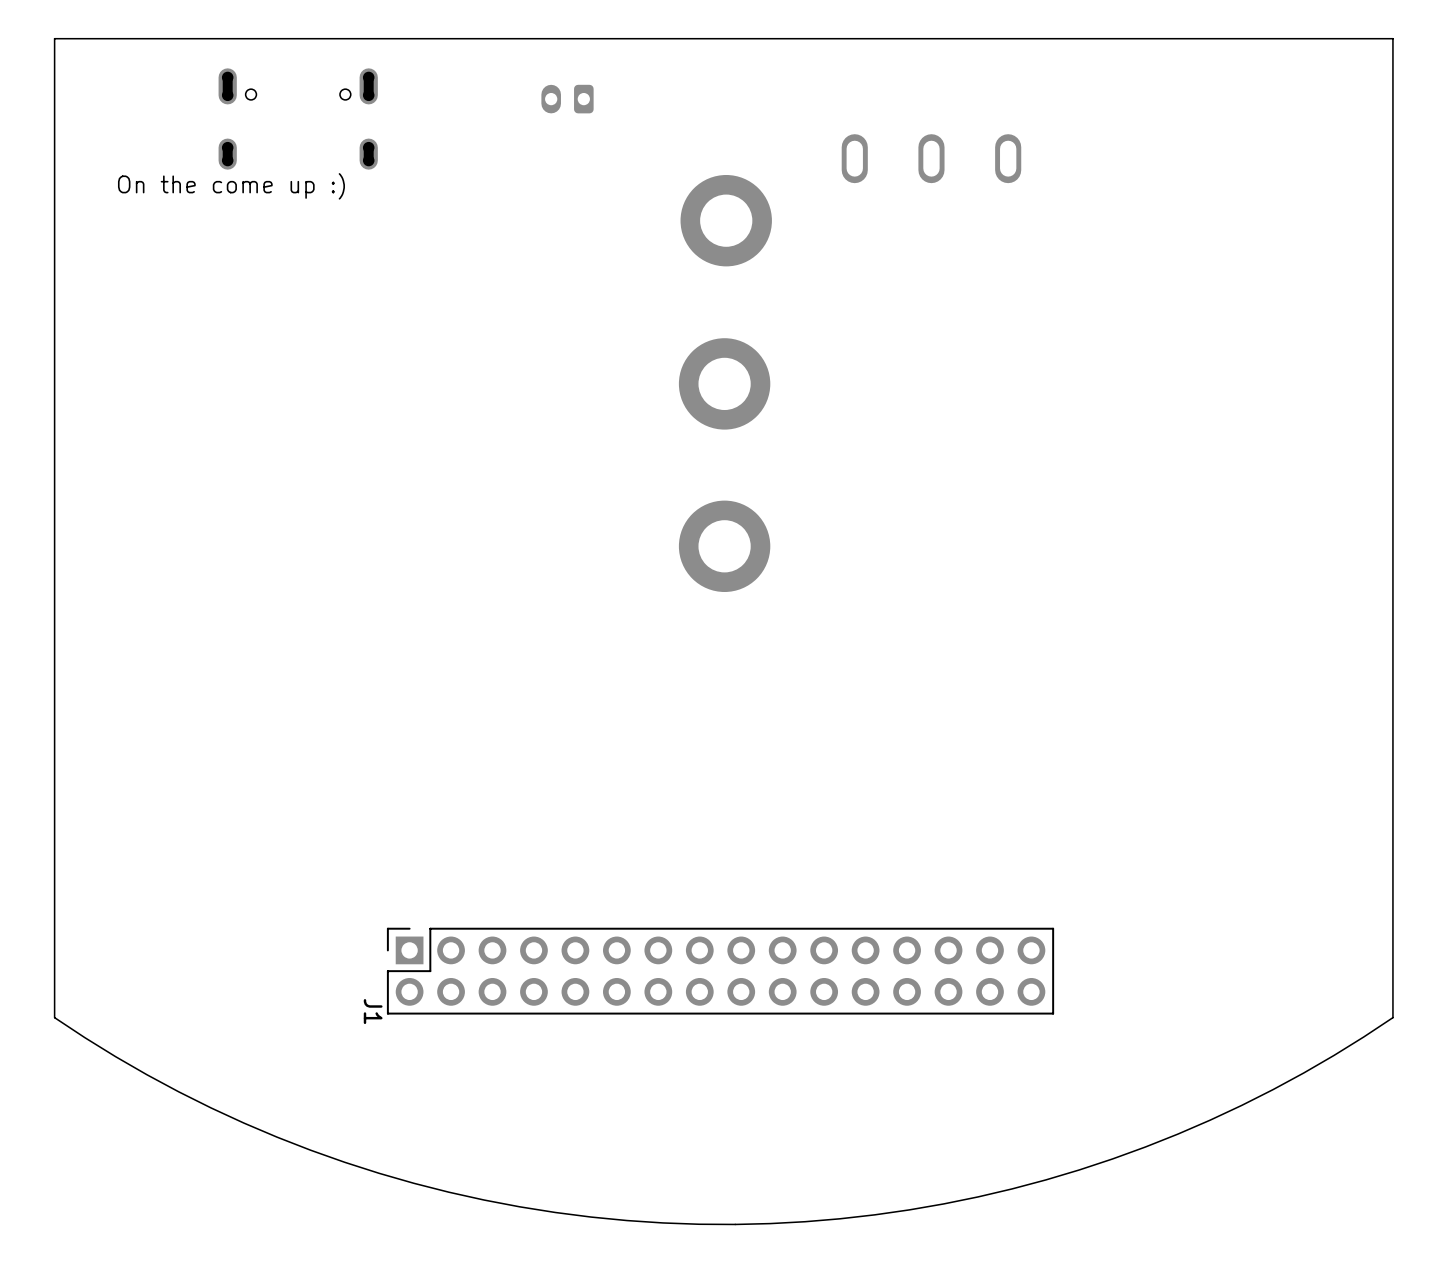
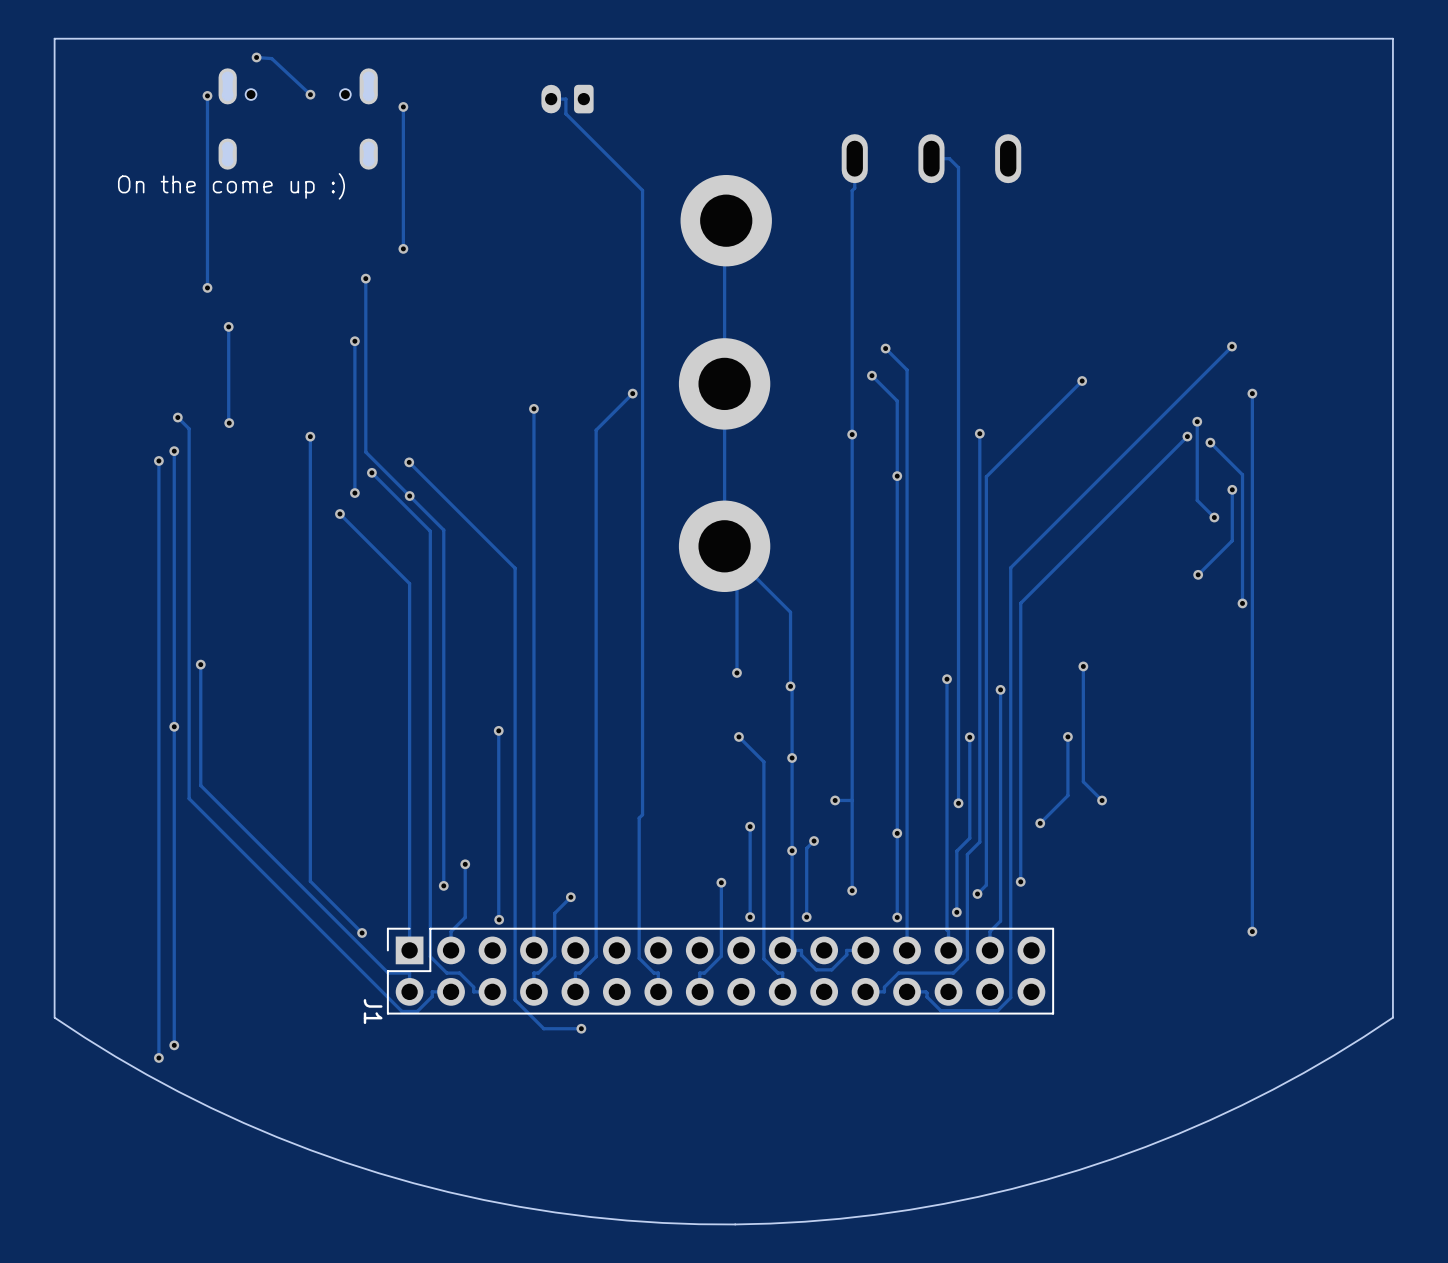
track: none -> (256, 57) (271, 58) (310, 94)
via: none -> (256, 57)
via: none -> (310, 94)
track: none -> (207, 95) (207, 287)
via: none -> (207, 95)
track: none -> (551, 99) (565, 99) (565, 113) (642, 190) (642, 814) (639, 818) (639, 958) (653, 973) (658, 973) (658, 991)
track: none -> (403, 106) (403, 248)
via: none -> (403, 106)
track: none -> (854, 158) (854, 188) (852, 190) (852, 890)
track: none -> (931, 158) (949, 158) (958, 167) (958, 803)
track: none -> (726, 220) (724, 222) (724, 546)
via: none -> (403, 248)
track: none -> (365, 278) (365, 452) (443, 530) (443, 885)
via: none -> (365, 278)
via: none -> (207, 287)
track: none -> (228, 326) (229, 423)
via: none -> (228, 326)
track: none -> (354, 341) (354, 493)
via: none -> (354, 341)
track: none -> (1231, 346) (1010, 567) (1010, 997) (997, 1010) (940, 1010) (927, 996) (925, 991) (907, 991)
via: none -> (1231, 346)
track: none -> (885, 348) (907, 369) (907, 950)
via: none -> (885, 348)
track: none -> (871, 375) (897, 400) (897, 917)
via: none -> (871, 375)
track: none -> (1082, 381) (986, 476) (986, 885) (977, 893)
via: none -> (1082, 381)
track: none -> (632, 393) (596, 430) (596, 956) (579, 973) (575, 973) (575, 991)
via: none -> (632, 393)
track: none -> (1252, 393) (1252, 931)
via: none -> (1252, 393)
track: none -> (533, 408) (533, 950)
via: none -> (533, 408)
track: none -> (177, 417) (189, 428) (189, 798) (401, 1011) (417, 1011) (432, 996) (432, 991) (451, 991)
via: none -> (177, 417)
track: none -> (1197, 421) (1197, 500) (1214, 517)
via: none -> (1197, 421)
via: none -> (229, 423)
track: none -> (979, 433) (979, 842) (967, 854) (967, 959) (953, 973) (898, 973) (884, 987) (884, 991) (865, 991)
via: none -> (979, 433)
via: none -> (852, 434)
track: none -> (310, 436) (310, 881) (362, 932)
via: none -> (310, 436)
track: none -> (1187, 436) (1020, 603) (1020, 881)
via: none -> (1187, 436)
track: none -> (1210, 442) (1242, 474) (1242, 603)
via: none -> (1210, 442)
track: none -> (174, 451) (174, 1045)
via: none -> (174, 451)
track: none -> (158, 460) (158, 1057)
via: none -> (158, 460)
track: none -> (409, 462) (515, 568) (515, 1000) (543, 1028) (581, 1028)
via: none -> (409, 462)
track: none -> (371, 472) (430, 531) (430, 956) (446, 973) (459, 973) (473, 987) (473, 991) (492, 991)
via: none -> (371, 472)
via: none -> (897, 476)
track: none -> (1232, 489) (1232, 540) (1198, 574)
via: none -> (1232, 489)
via: none -> (354, 493)
via: none -> (409, 496)
track: none -> (339, 514) (409, 583) (409, 950)
via: none -> (339, 514)
via: none -> (1214, 517)
track: none -> (724, 546) (736, 558) (736, 672)
track: none -> (724, 546) (790, 612) (792, 950)
via: none -> (1198, 574)
via: none -> (1242, 603)
track: none -> (200, 664) (200, 785) (388, 973) (409, 973) (409, 991)
via: none -> (200, 664)
track: none -> (1083, 666) (1083, 781) (1102, 800)
via: none -> (1083, 666)
via: none -> (736, 672)
track: none -> (947, 679) (948, 950)
via: none -> (947, 679)
via: none -> (790, 686)
track: none -> (1000, 689) (1000, 921) (989, 931) (989, 950)
via: none -> (1000, 689)
via: none -> (174, 726)
track: none -> (498, 730) (499, 919)
via: none -> (498, 730)
track: none -> (738, 736) (763, 761) (763, 958) (778, 973) (782, 973) (782, 991)
via: none -> (738, 736)
track: none -> (1067, 736) (1067, 795) (1040, 823)
via: none -> (1067, 736)
track: none -> (969, 737) (969, 838) (956, 851) (956, 912)
via: none -> (969, 737)
via: none -> (792, 757)
via: none -> (835, 800)
track: none -> (852, 800) (835, 800)
via: none -> (1102, 800)
via: none -> (958, 803)
via: none -> (1040, 823)
track: none -> (750, 826) (750, 917)
via: none -> (750, 826)
via: none -> (897, 833)
track: none -> (814, 841) (806, 848) (806, 917)
via: none -> (814, 841)
via: none -> (792, 850)
track: none -> (465, 864) (465, 917) (451, 931) (451, 950)
via: none -> (465, 864)
via: none -> (1020, 881)
track: none -> (721, 882) (721, 956) (704, 973) (699, 973) (699, 991)
via: none -> (721, 882)
via: none -> (443, 885)
via: none -> (852, 890)
via: none -> (977, 893)
track: none -> (570, 897) (554, 913) (554, 956) (538, 973) (533, 973) (533, 991)
via: none -> (570, 897)
via: none -> (956, 912)
via: none -> (750, 917)
via: none -> (806, 917)
via: none -> (897, 917)
via: none -> (499, 919)
via: none -> (1252, 931)
via: none -> (362, 932)
track: none -> (865, 950) (846, 950) (846, 954) (831, 969) (816, 969) (801, 955) (801, 950) (782, 950)
via: none -> (581, 1028)
via: none -> (174, 1045)
via: none -> (158, 1057)

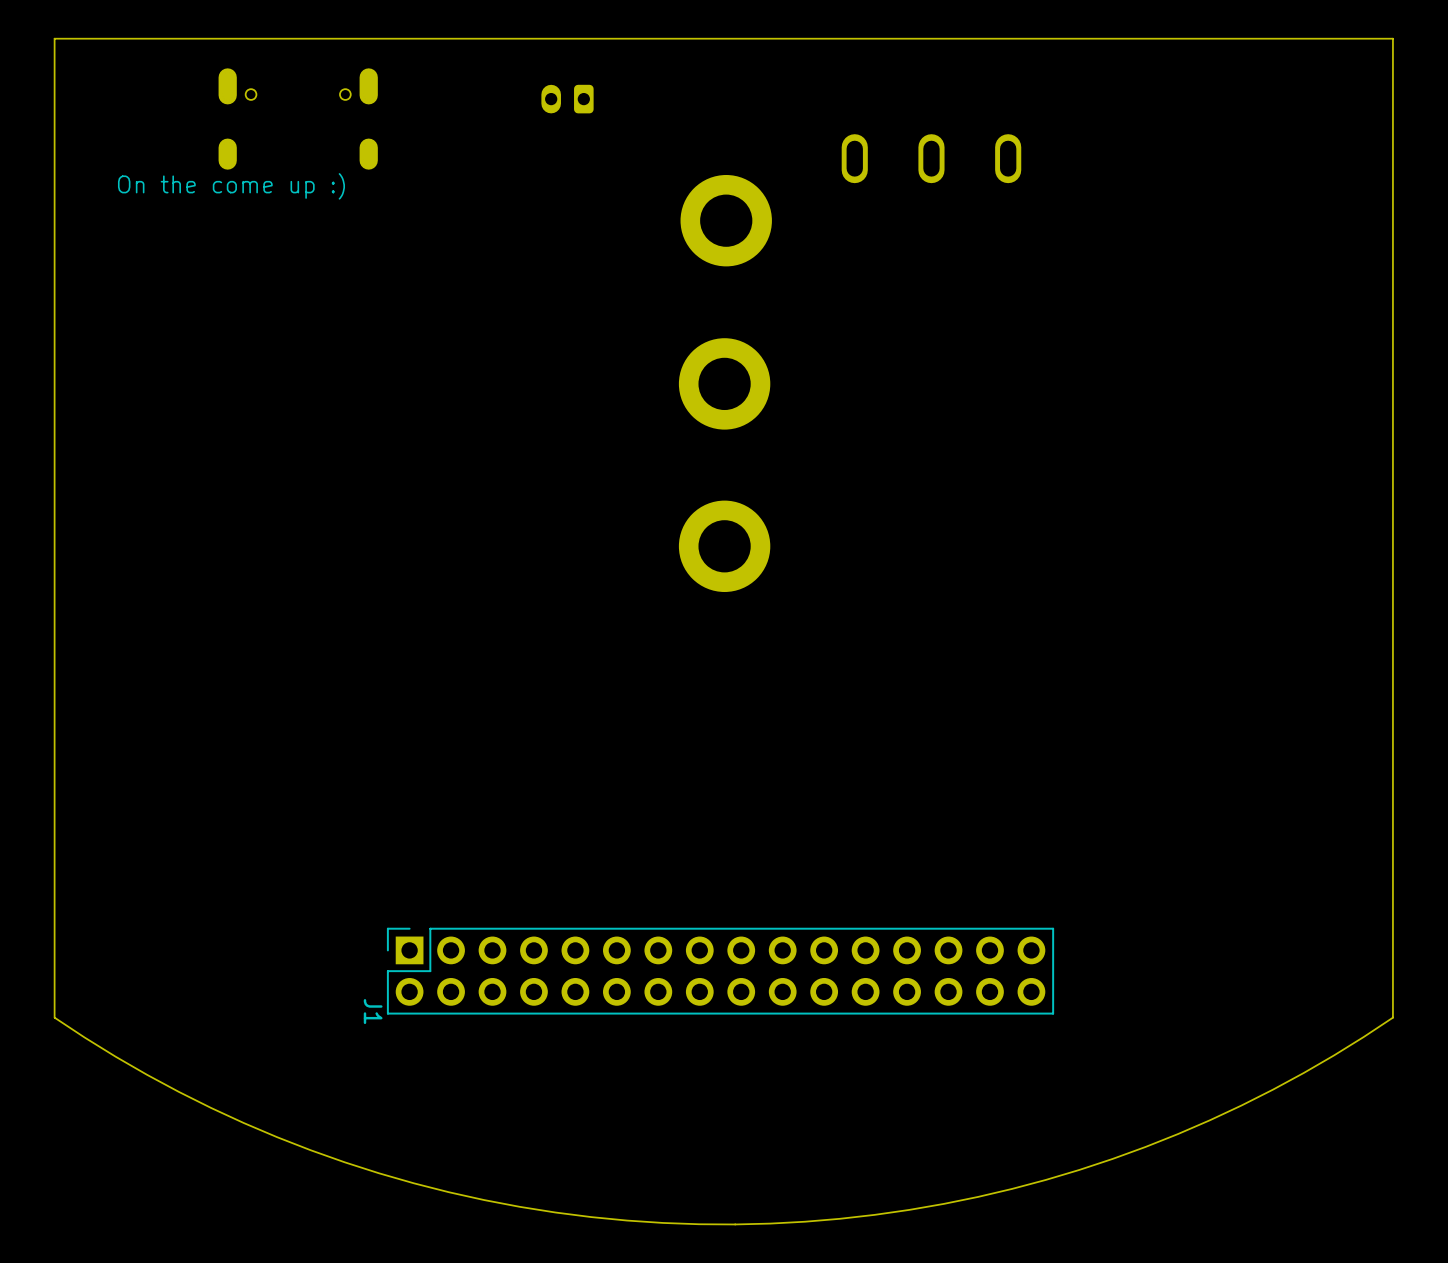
track: (256, 57) (271, 58) (310, 94) -> none
via: (256, 57) -> none
via: (310, 94) -> none
track: (207, 95) (207, 287) -> none
via: (207, 95) -> none
track: (551, 99) (565, 99) (565, 113) (642, 190) (642, 814) (639, 818) (639, 958) (653, 973) (658, 973) (658, 991) -> none
track: (403, 106) (403, 248) -> none
via: (403, 106) -> none
track: (854, 158) (854, 188) (852, 190) (852, 890) -> none
track: (931, 158) (949, 158) (958, 167) (958, 803) -> none
track: (726, 220) (724, 222) (724, 546) -> none
via: (403, 248) -> none
track: (365, 278) (365, 452) (443, 530) (443, 885) -> none
via: (365, 278) -> none
via: (207, 287) -> none
track: (228, 326) (229, 423) -> none
via: (228, 326) -> none
track: (354, 341) (354, 493) -> none
via: (354, 341) -> none
track: (1231, 346) (1010, 567) (1010, 997) (997, 1010) (940, 1010) (927, 996) (925, 991) (907, 991) -> none
via: (1231, 346) -> none
track: (885, 348) (907, 369) (907, 950) -> none
via: (885, 348) -> none
track: (871, 375) (897, 400) (897, 917) -> none
via: (871, 375) -> none
track: (1082, 381) (986, 476) (986, 885) (977, 893) -> none
via: (1082, 381) -> none
track: (632, 393) (596, 430) (596, 956) (579, 973) (575, 973) (575, 991) -> none
via: (632, 393) -> none
track: (1252, 393) (1252, 931) -> none
via: (1252, 393) -> none
track: (533, 408) (533, 950) -> none
via: (533, 408) -> none
track: (177, 417) (189, 428) (189, 798) (401, 1011) (417, 1011) (432, 996) (432, 991) (451, 991) -> none
via: (177, 417) -> none
track: (1197, 421) (1197, 500) (1214, 517) -> none
via: (1197, 421) -> none
via: (229, 423) -> none
track: (979, 433) (979, 842) (967, 854) (967, 959) (953, 973) (898, 973) (884, 987) (884, 991) (865, 991) -> none
via: (979, 433) -> none
via: (852, 434) -> none
track: (310, 436) (310, 881) (362, 932) -> none
via: (310, 436) -> none
track: (1187, 436) (1020, 603) (1020, 881) -> none
via: (1187, 436) -> none
track: (1210, 442) (1242, 474) (1242, 603) -> none
via: (1210, 442) -> none
track: (174, 451) (174, 1045) -> none
via: (174, 451) -> none
track: (158, 460) (158, 1057) -> none
via: (158, 460) -> none
track: (409, 462) (515, 568) (515, 1000) (543, 1028) (581, 1028) -> none
via: (409, 462) -> none
track: (371, 472) (430, 531) (430, 956) (446, 973) (459, 973) (473, 987) (473, 991) (492, 991) -> none
via: (371, 472) -> none
via: (897, 476) -> none
track: (1232, 489) (1232, 540) (1198, 574) -> none
via: (1232, 489) -> none
via: (354, 493) -> none
via: (409, 496) -> none
track: (339, 514) (409, 583) (409, 950) -> none
via: (339, 514) -> none
via: (1214, 517) -> none
track: (724, 546) (736, 558) (736, 672) -> none
track: (724, 546) (790, 612) (792, 950) -> none
via: (1198, 574) -> none
via: (1242, 603) -> none
track: (200, 664) (200, 785) (388, 973) (409, 973) (409, 991) -> none
via: (200, 664) -> none
track: (1083, 666) (1083, 781) (1102, 800) -> none
via: (1083, 666) -> none
via: (736, 672) -> none
track: (947, 679) (948, 950) -> none
via: (947, 679) -> none
via: (790, 686) -> none
track: (1000, 689) (1000, 921) (989, 931) (989, 950) -> none
via: (1000, 689) -> none
via: (174, 726) -> none
track: (498, 730) (499, 919) -> none
via: (498, 730) -> none
track: (738, 736) (763, 761) (763, 958) (778, 973) (782, 973) (782, 991) -> none
via: (738, 736) -> none
track: (1067, 736) (1067, 795) (1040, 823) -> none
via: (1067, 736) -> none
track: (969, 737) (969, 838) (956, 851) (956, 912) -> none
via: (969, 737) -> none
via: (792, 757) -> none
via: (835, 800) -> none
track: (852, 800) (835, 800) -> none
via: (1102, 800) -> none
via: (958, 803) -> none
via: (1040, 823) -> none
track: (750, 826) (750, 917) -> none
via: (750, 826) -> none
via: (897, 833) -> none
track: (814, 841) (806, 848) (806, 917) -> none
via: (814, 841) -> none
via: (792, 850) -> none
track: (465, 864) (465, 917) (451, 931) (451, 950) -> none
via: (465, 864) -> none
via: (1020, 881) -> none
track: (721, 882) (721, 956) (704, 973) (699, 973) (699, 991) -> none
via: (721, 882) -> none
via: (443, 885) -> none
via: (852, 890) -> none
via: (977, 893) -> none
track: (570, 897) (554, 913) (554, 956) (538, 973) (533, 973) (533, 991) -> none
via: (570, 897) -> none
via: (956, 912) -> none
via: (750, 917) -> none
via: (806, 917) -> none
via: (897, 917) -> none
via: (499, 919) -> none
via: (1252, 931) -> none
via: (362, 932) -> none
track: (865, 950) (846, 950) (846, 954) (831, 969) (816, 969) (801, 955) (801, 950) (782, 950) -> none
via: (581, 1028) -> none
via: (174, 1045) -> none
via: (158, 1057) -> none

